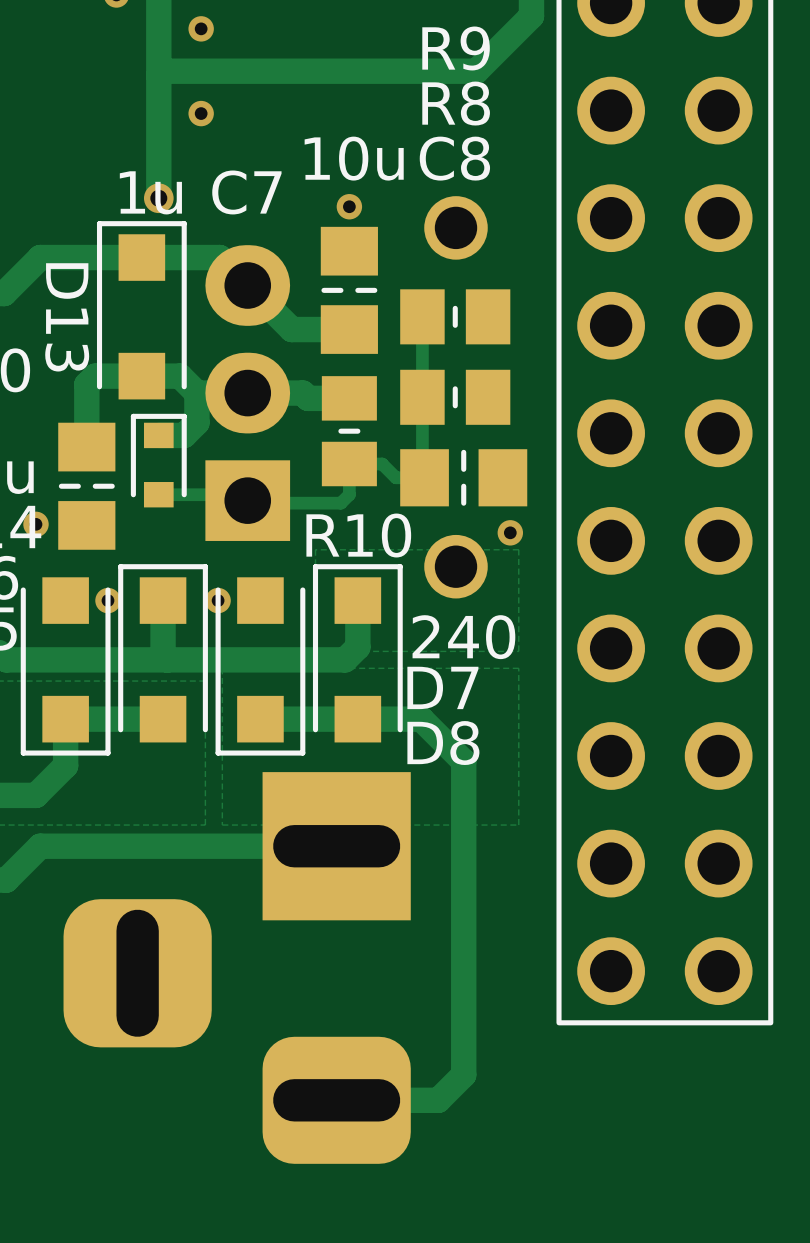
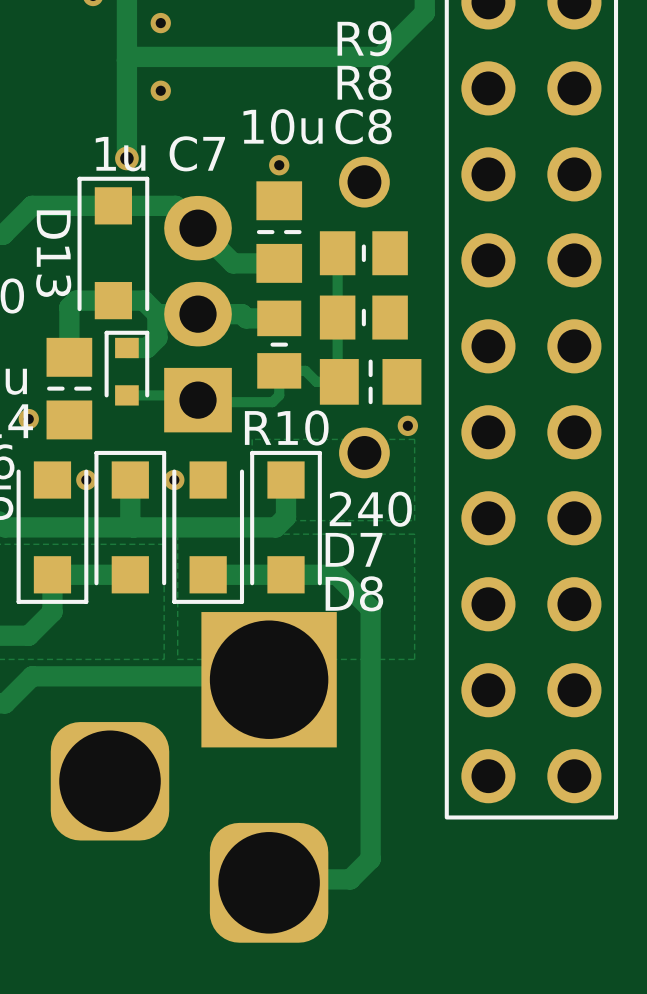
part footprint: [63, 772, 411, 1164] -> [50, 612, 337, 943]

